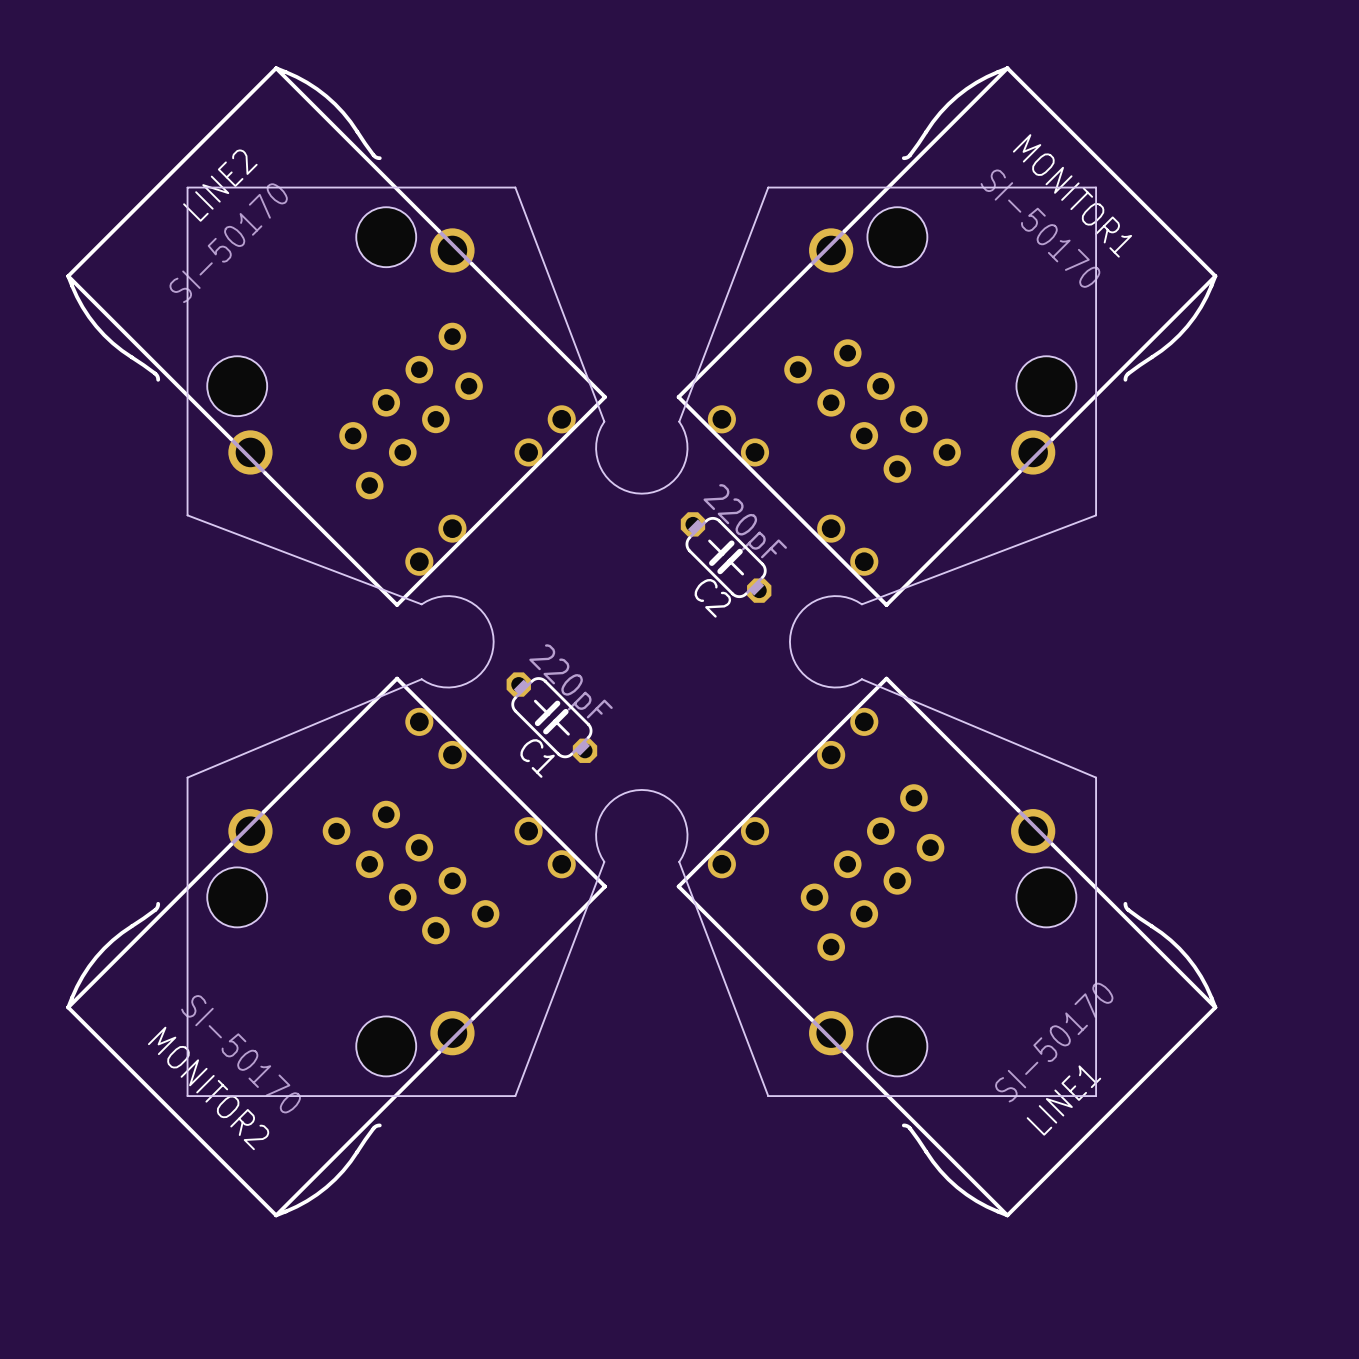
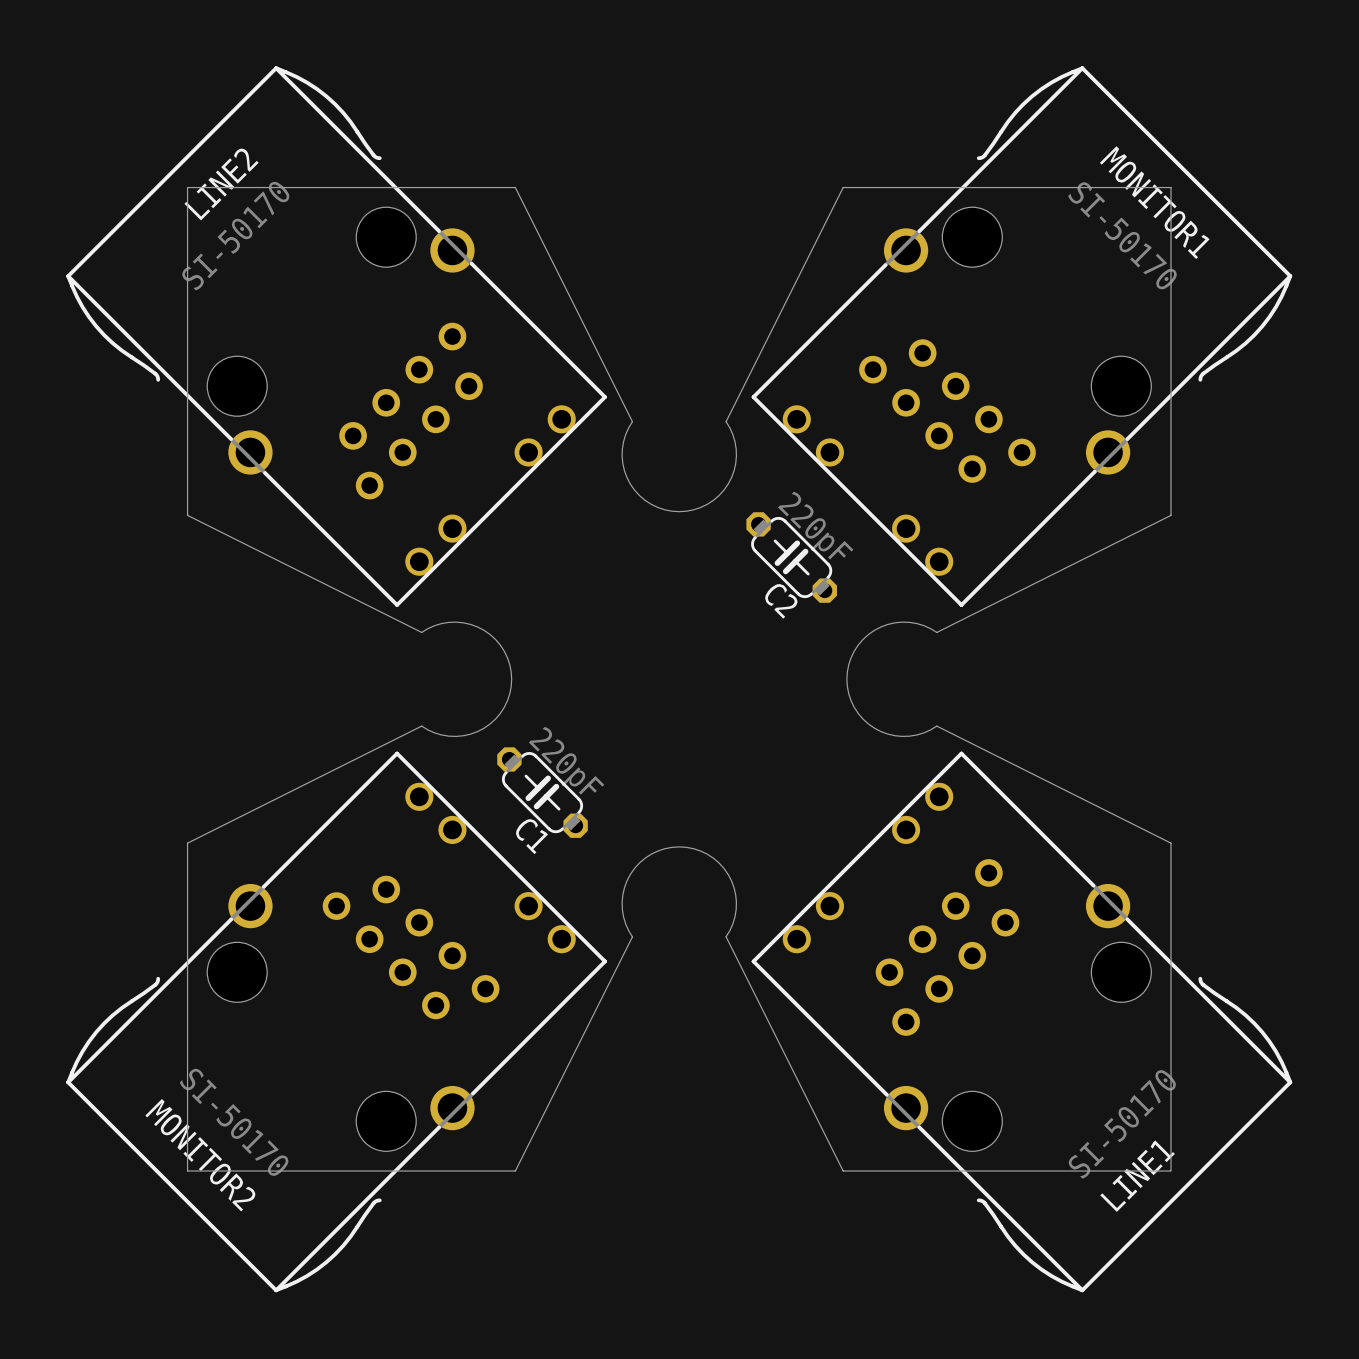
board edge: (515, 187) (604, 421) (596, 443) (599, 466) (606, 476) (619, 487) (641, 493) (664, 487) (677, 476) (683, 466) (687, 443) (679, 421) (768, 187) (843, 187) -> (515, 187) (632, 421) (625, 434) (622, 448) (622, 463) (626, 477) (634, 490) (645, 500) (664, 509) (679, 511) (693, 509) (713, 500) (723, 490) (731, 477) (735, 463) (736, 448) (732, 434) (726, 421) (843, 187)
board edge: (1096, 187) (1096, 515) (861, 604) (840, 596) (817, 599) (807, 606) (795, 619) (789, 641) (795, 664) (807, 677) (817, 683) (840, 687) (861, 679) (1096, 777) (1096, 1096) (768, 1096) (679, 861) (687, 840) (683, 817) (677, 807) (664, 795) (641, 789) (619, 795) (606, 807) (599, 817) (596, 840) (604, 861) (515, 1096) (187, 1096) -> (1170, 1171) (843, 1171) (726, 936) (732, 923) (736, 909) (735, 894) (731, 880) (723, 868) (713, 858) (700, 851) (686, 847) (671, 847) (657, 851) (645, 858) (630, 874) (624, 887) (622, 902) (625, 923) (632, 936) (515, 1171) (187, 1171) (187, 1096)
board edge: none -> (1096, 187) (1171, 187) (1171, 515) (936, 632) (923, 625) (902, 622) (887, 624) (874, 630) (858, 645) (851, 657) (847, 671) (847, 686) (851, 700) (858, 713) (868, 723) (880, 731) (894, 735) (909, 736) (923, 732) (936, 726) (1171, 843) (1171, 1171)
MONITOR1 position: (946, 336) -> (1021, 336)
board edge: (187, 515) (421, 604) (443, 596) (466, 599) (476, 606) (487, 619) (493, 641) (487, 664) (476, 677) (466, 683) (443, 687) (421, 679) (187, 777) (187, 843) -> (187, 515) (421, 632) (434, 625) (448, 622) (463, 622) (477, 626) (490, 634) (500, 645) (509, 664) (511, 679) (509, 693) (500, 713) (490, 723) (477, 731) (463, 735) (448, 736) (434, 732) (421, 726) (187, 843)
C2 position: (726, 557) -> (791, 557)
C1 position: (551, 717) -> (542, 792)
MONITOR2 position: (336, 946) -> (336, 1021)
LINE1 position: (946, 946) -> (1021, 1021)

